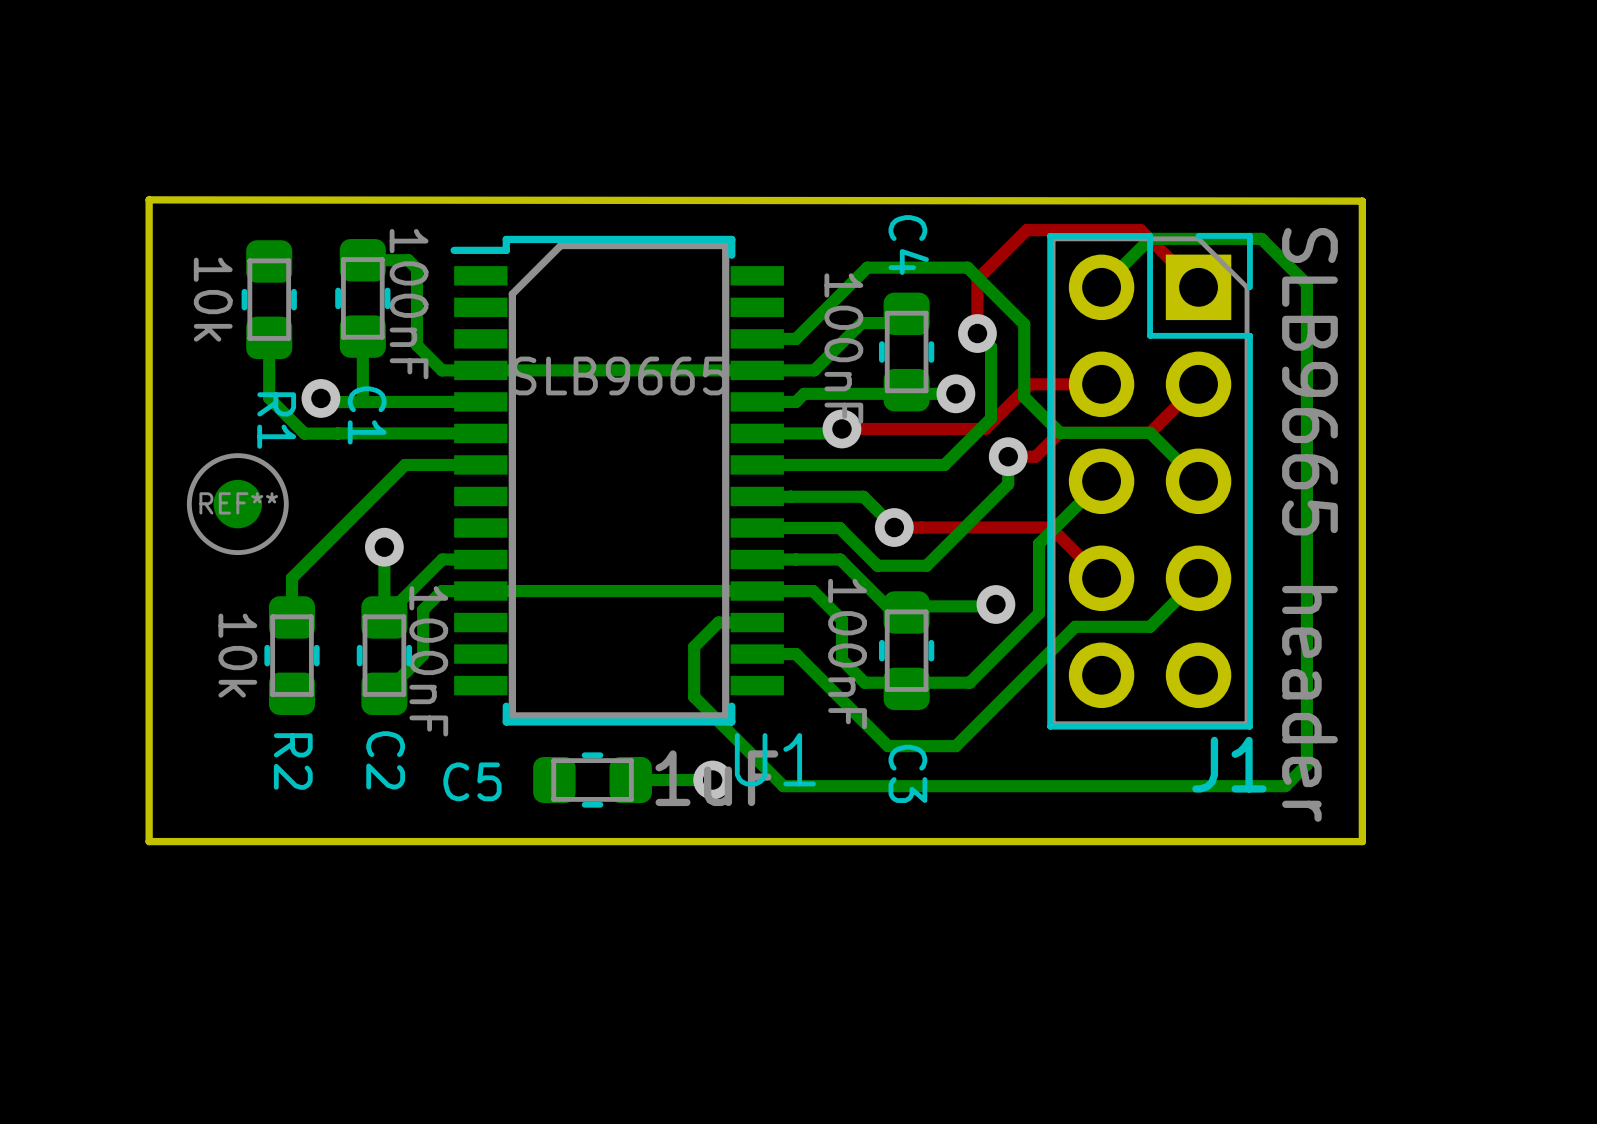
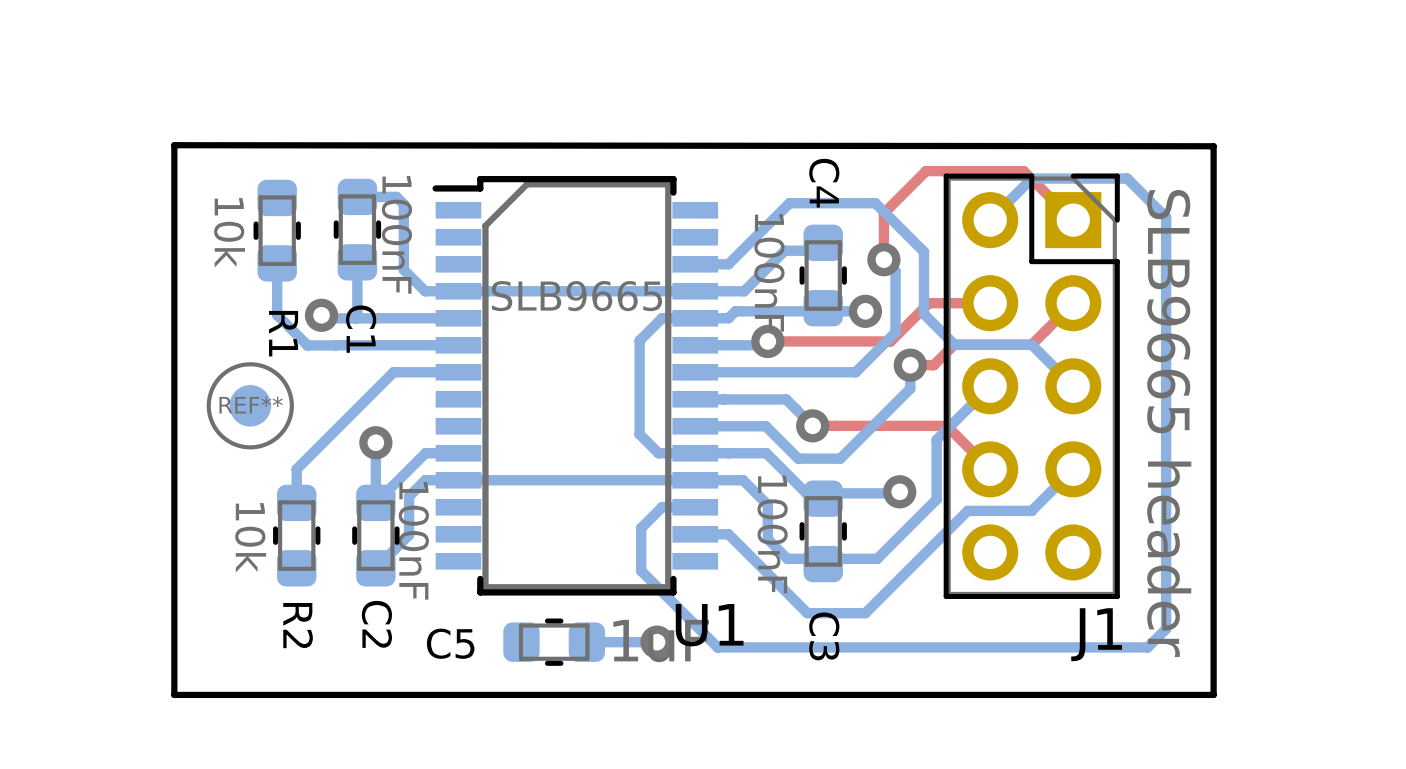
bottom track: none -> (695, 318) (662, 318) (639, 340) (639, 434) (658, 453) (695, 453)

